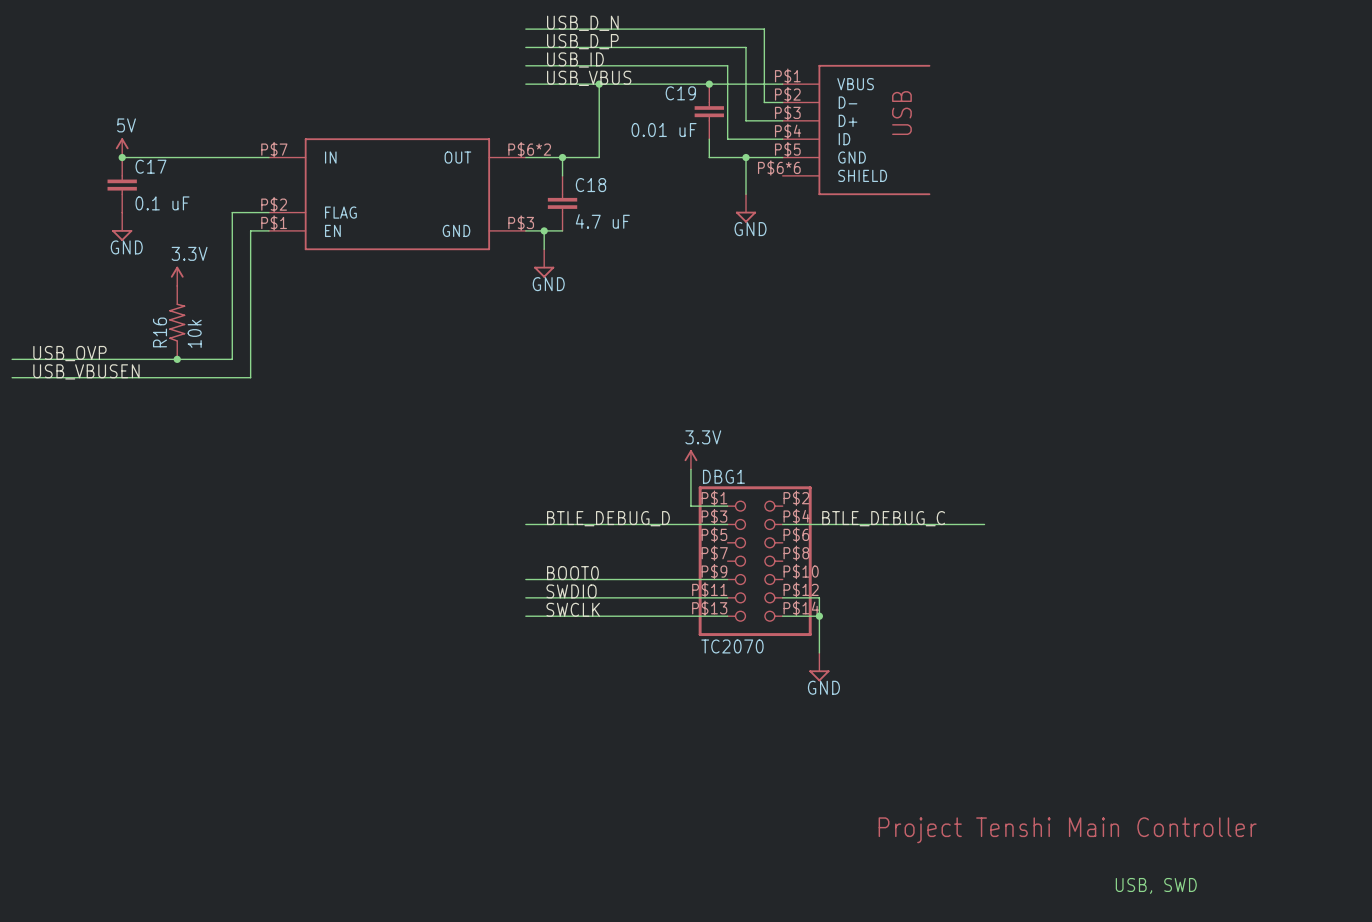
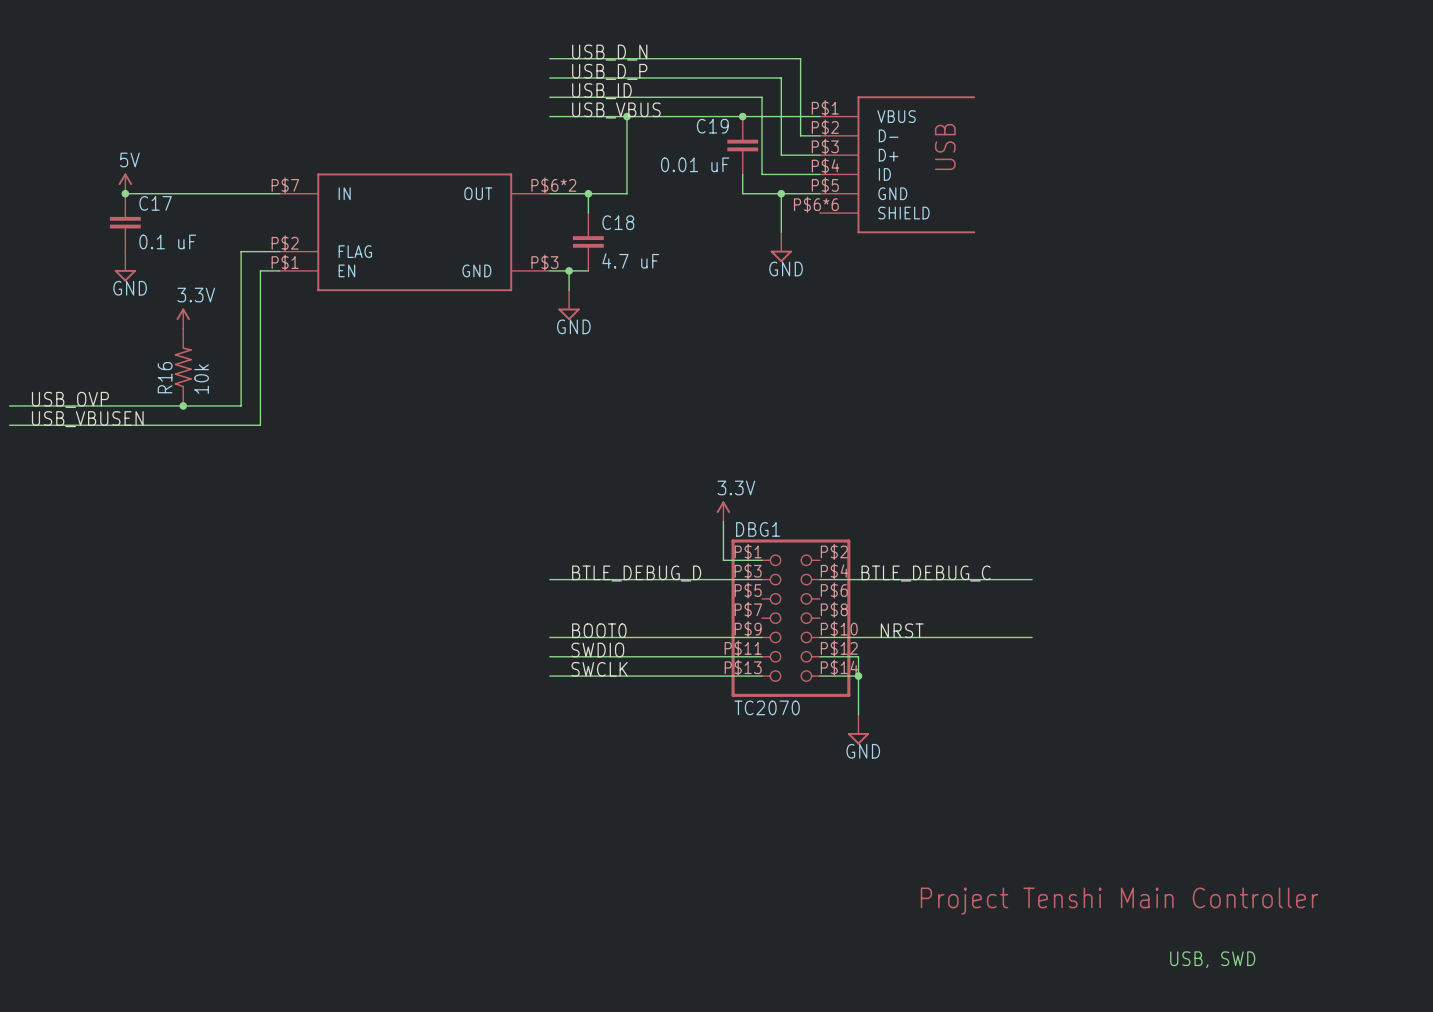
label: none -> NRST (902, 630)
wire: none -> (819, 637) (1032, 637)

